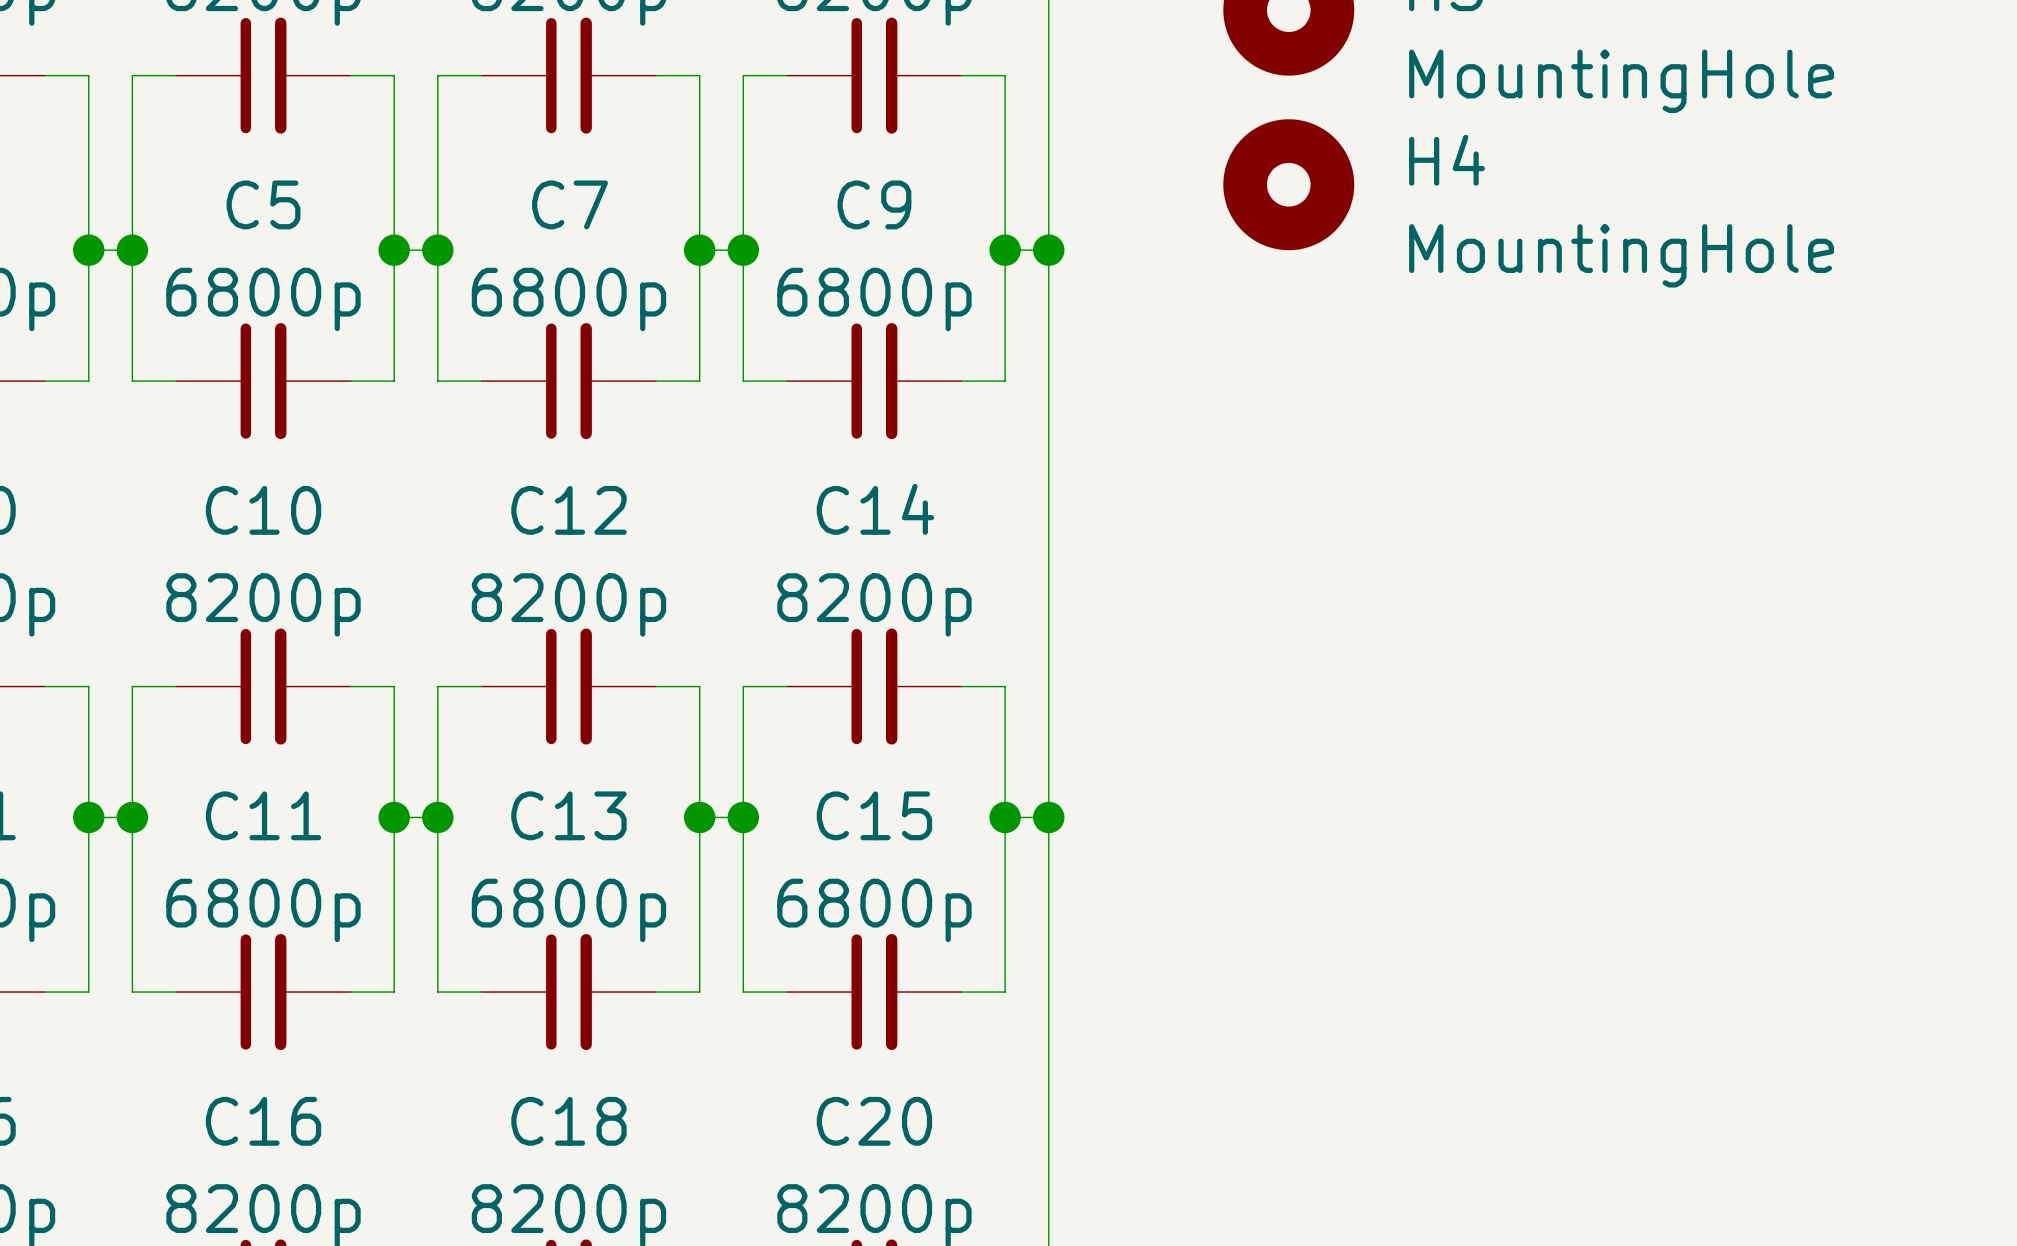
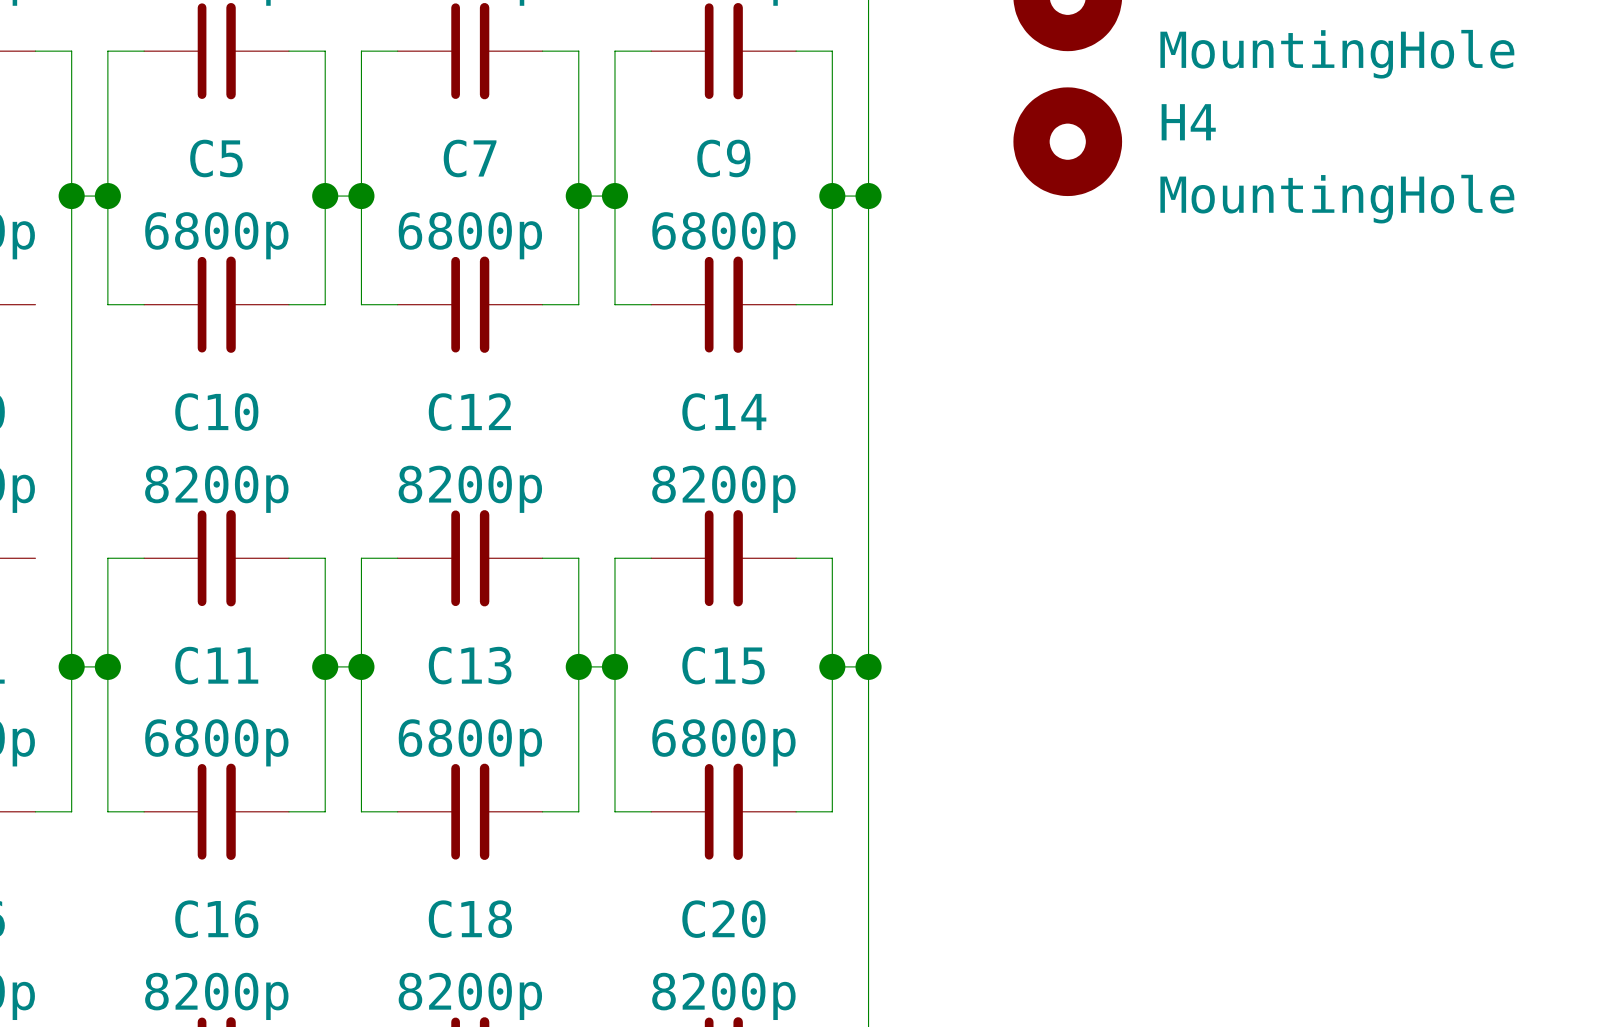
wire: (45, 381) (88, 381) -> (71, 558) (71, 304)
wire: (45, 686) (88, 686) -> none

